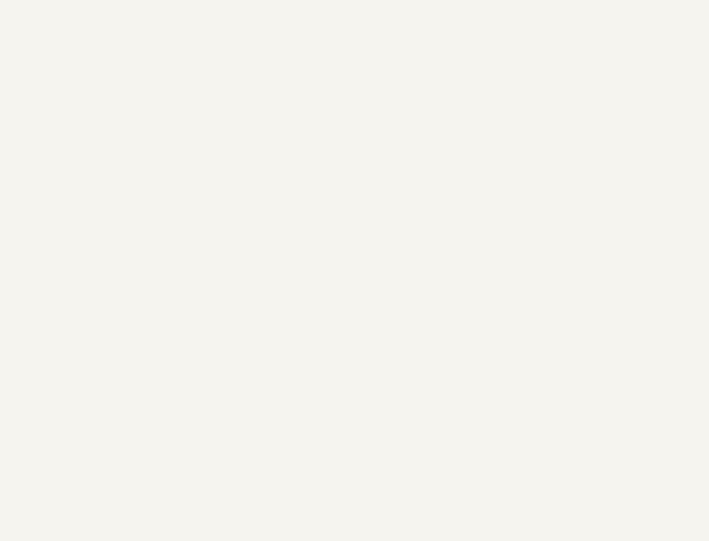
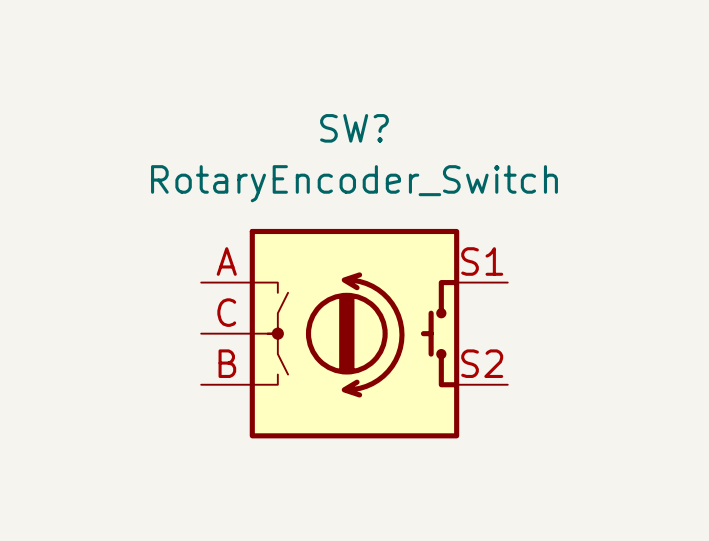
SW?: none -> RotaryEncoder_Switch (354, 333)

